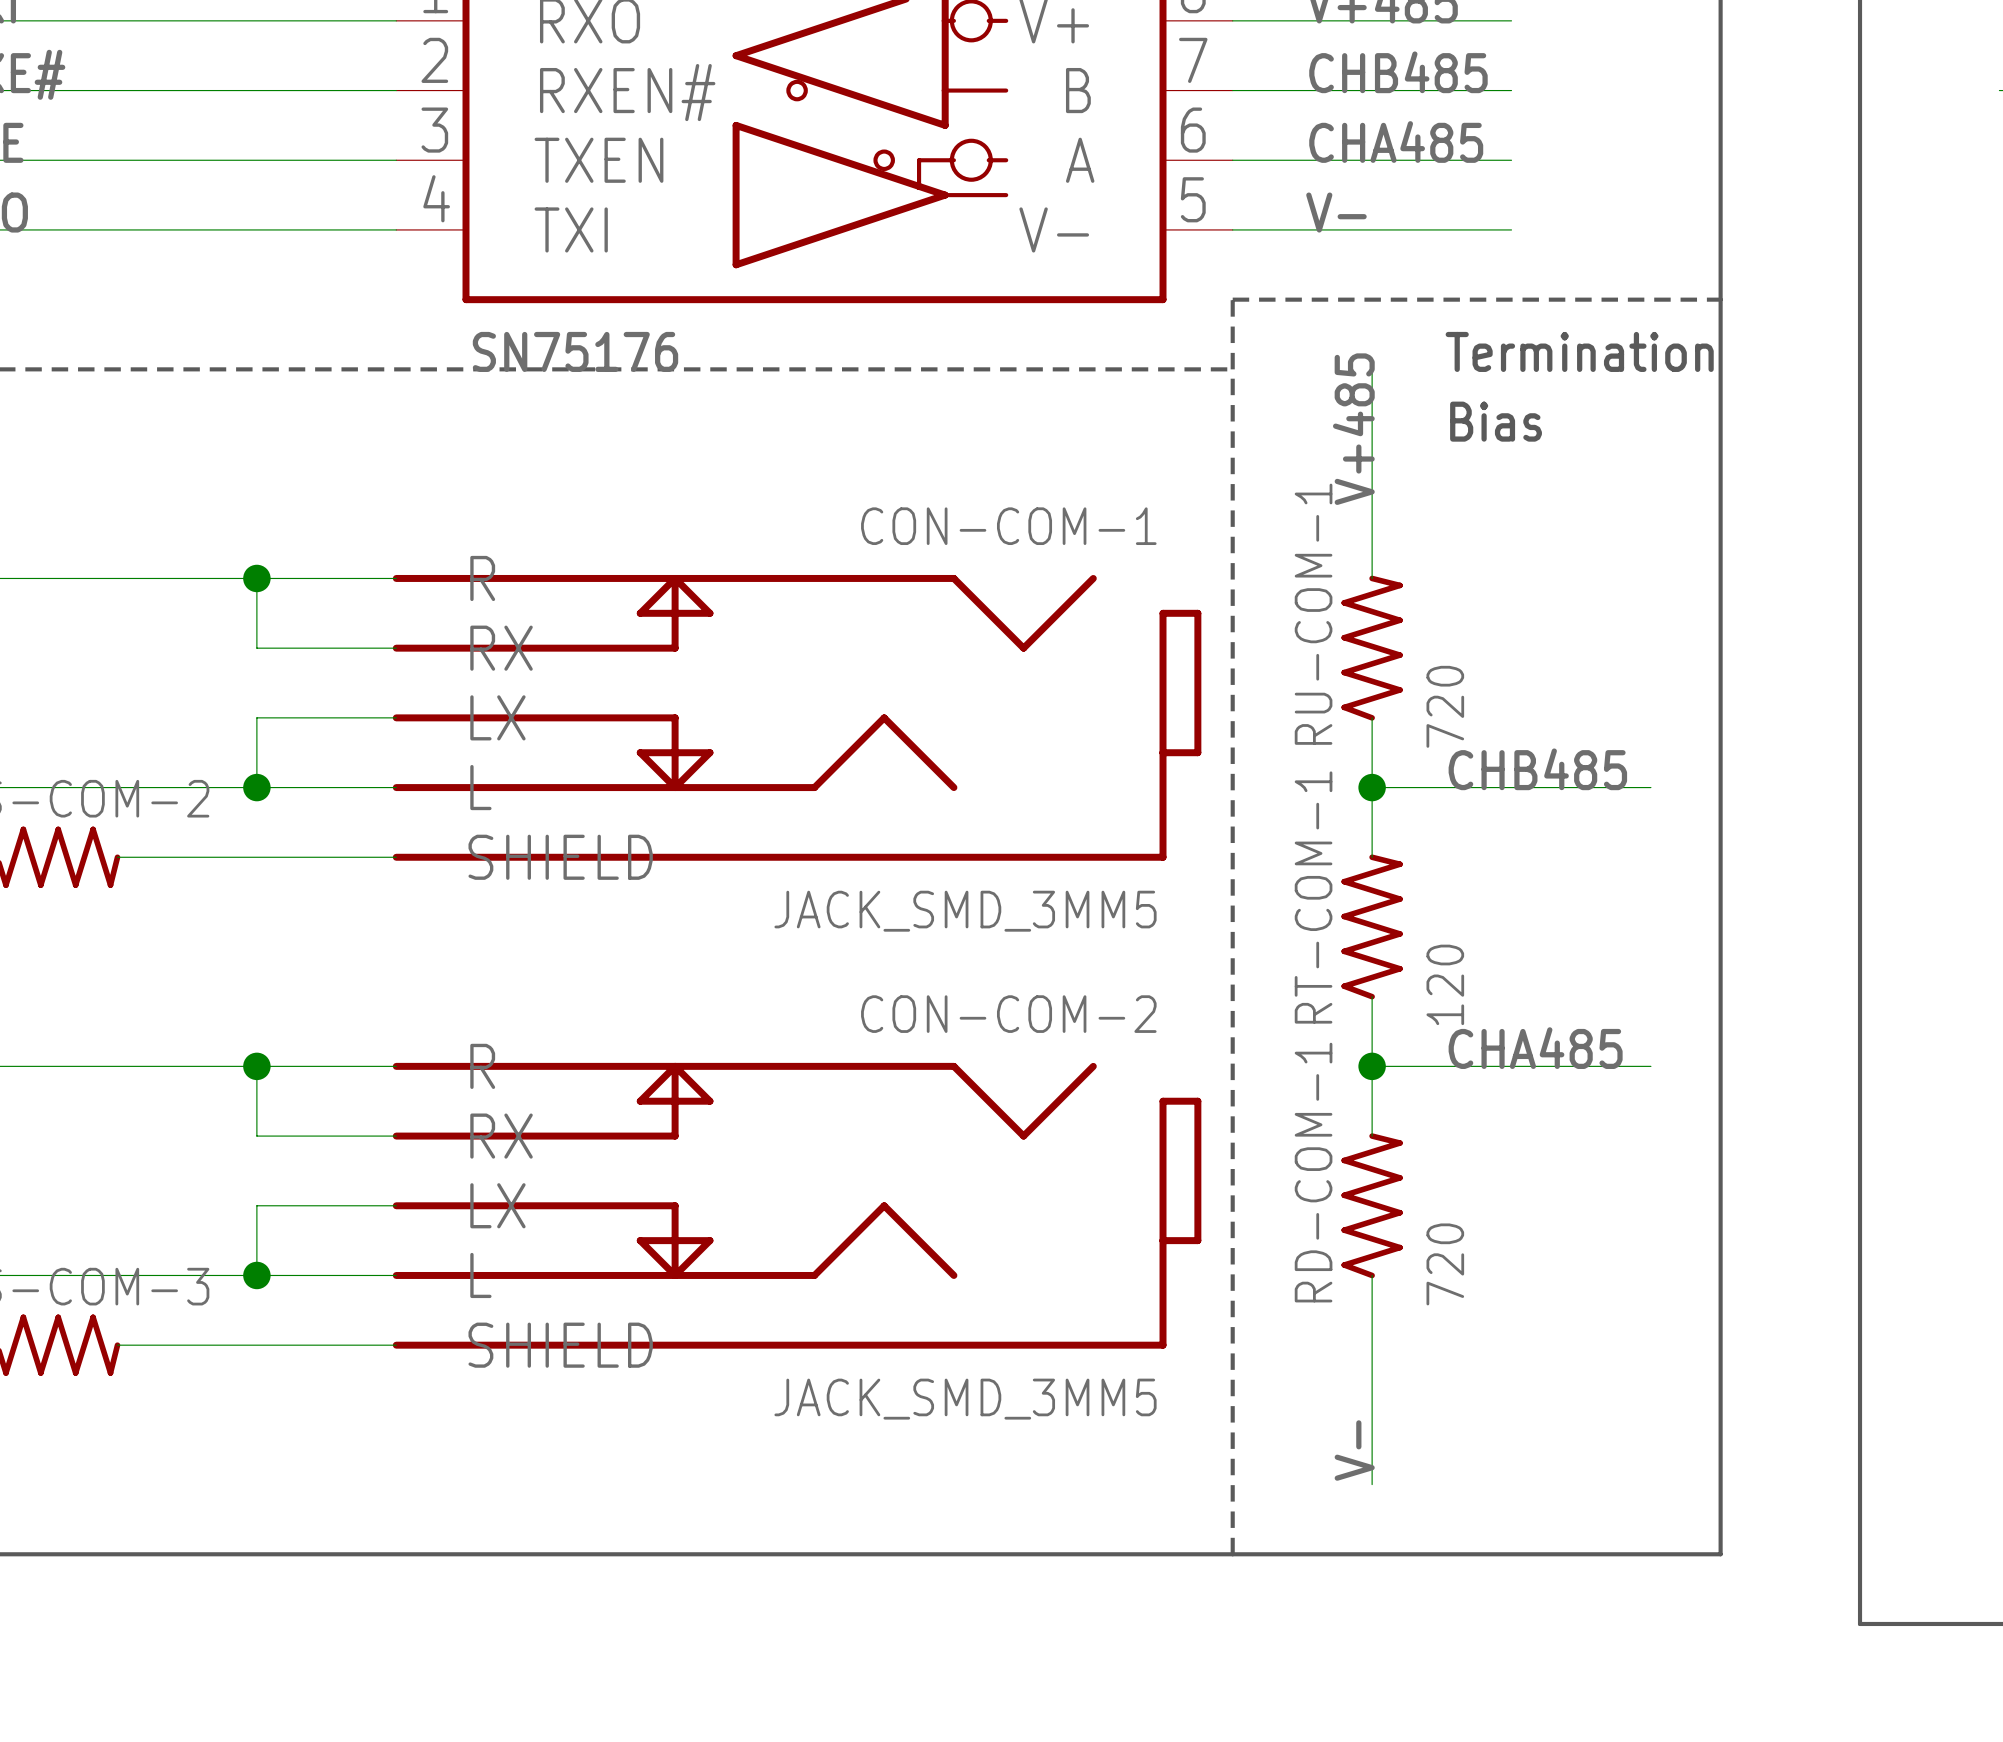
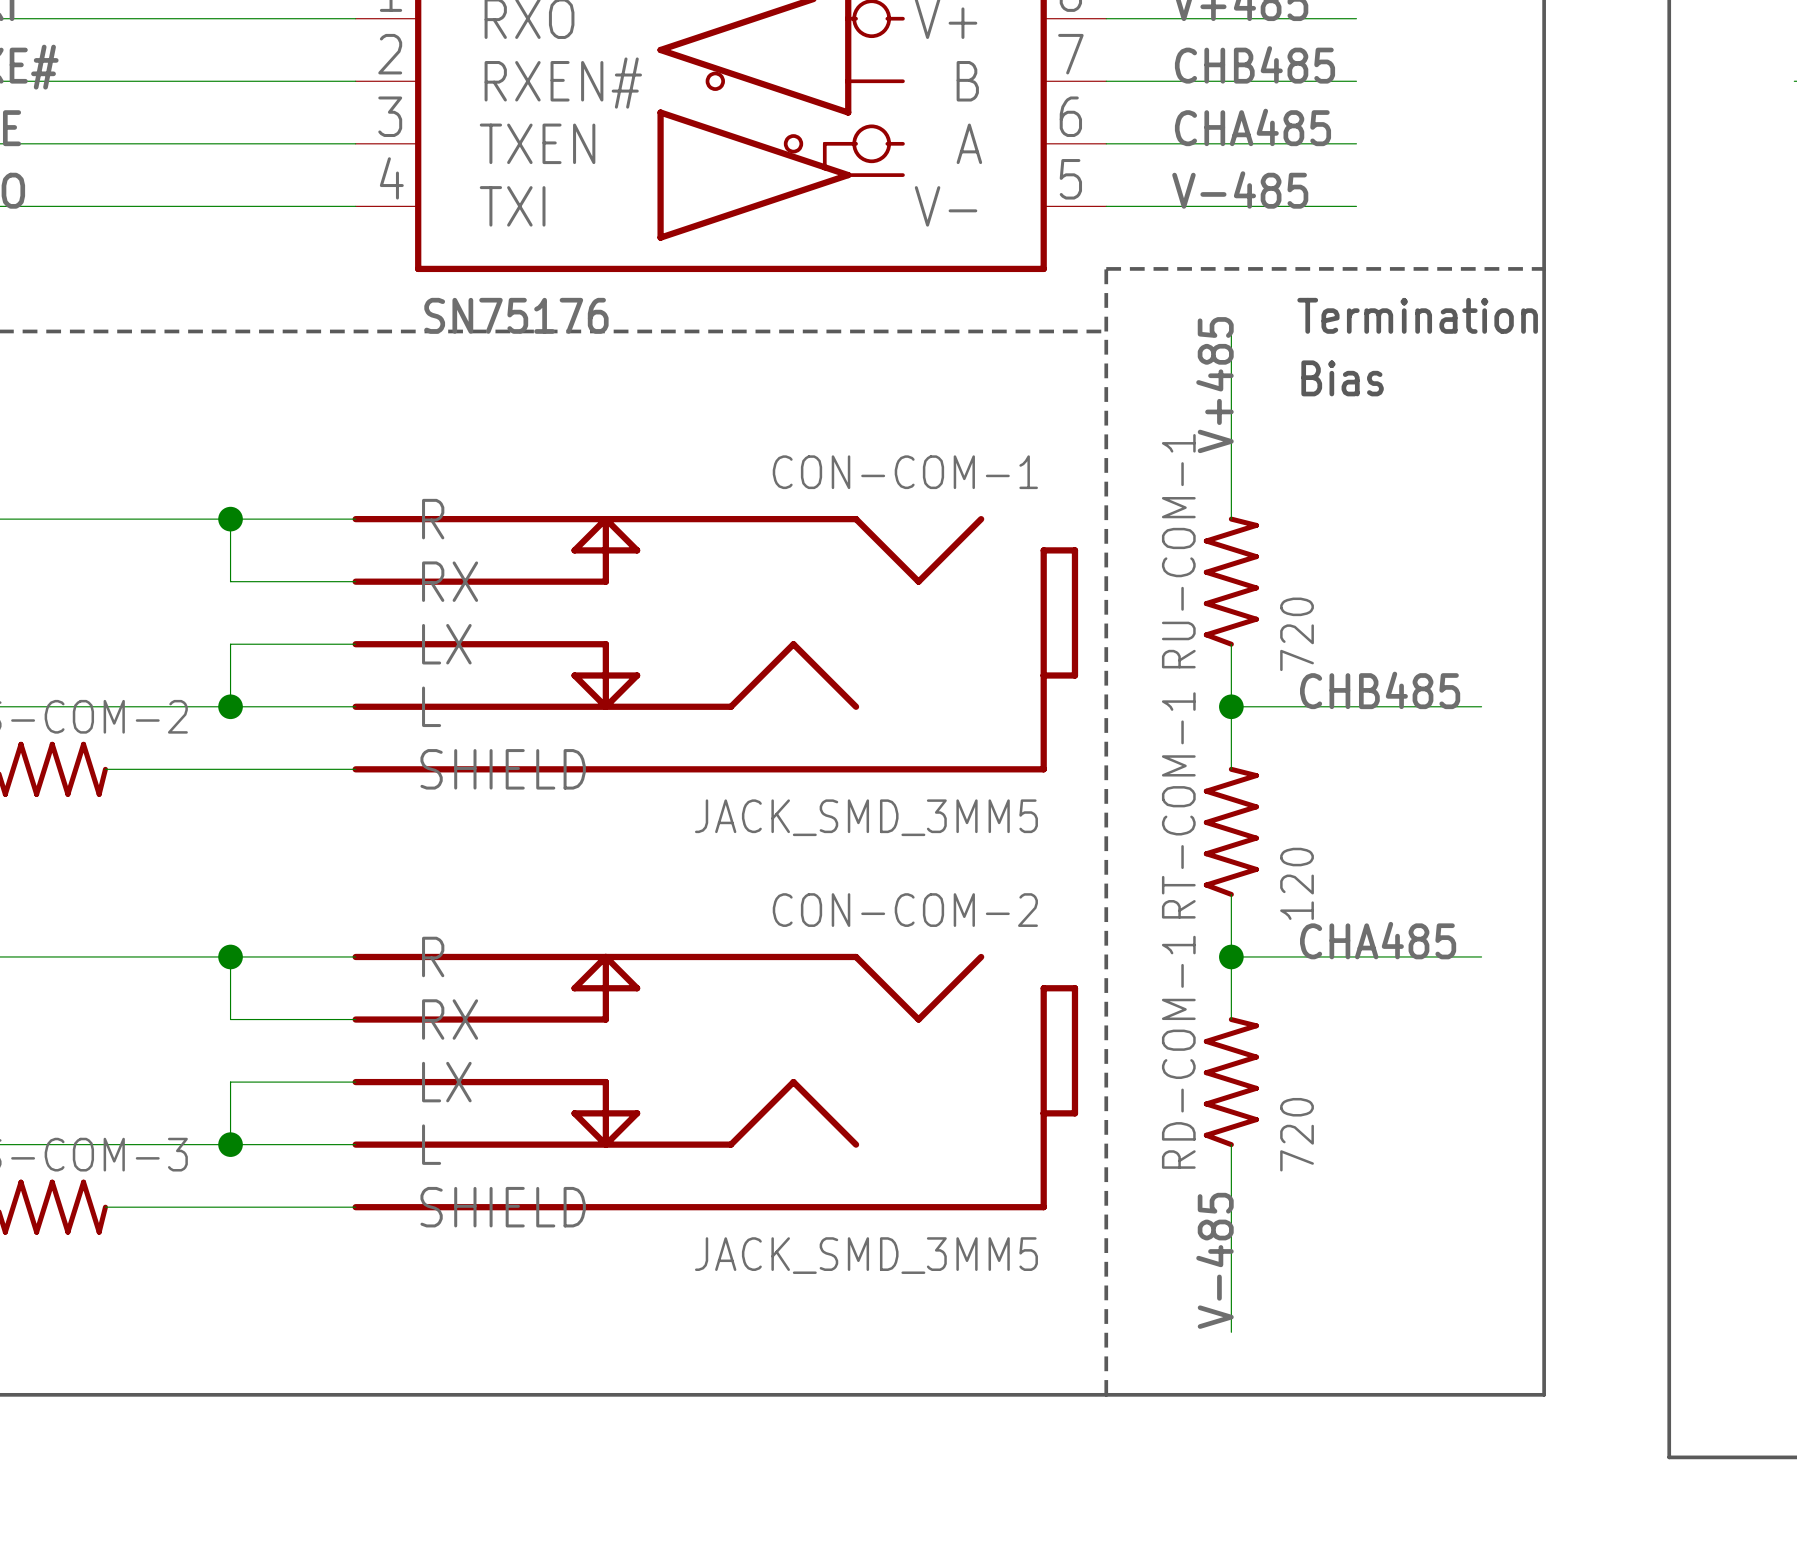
label: V- (1336, 212) -> V-485 (1240, 189)
label: V- (1354, 1450) -> V-485 (1214, 1260)

